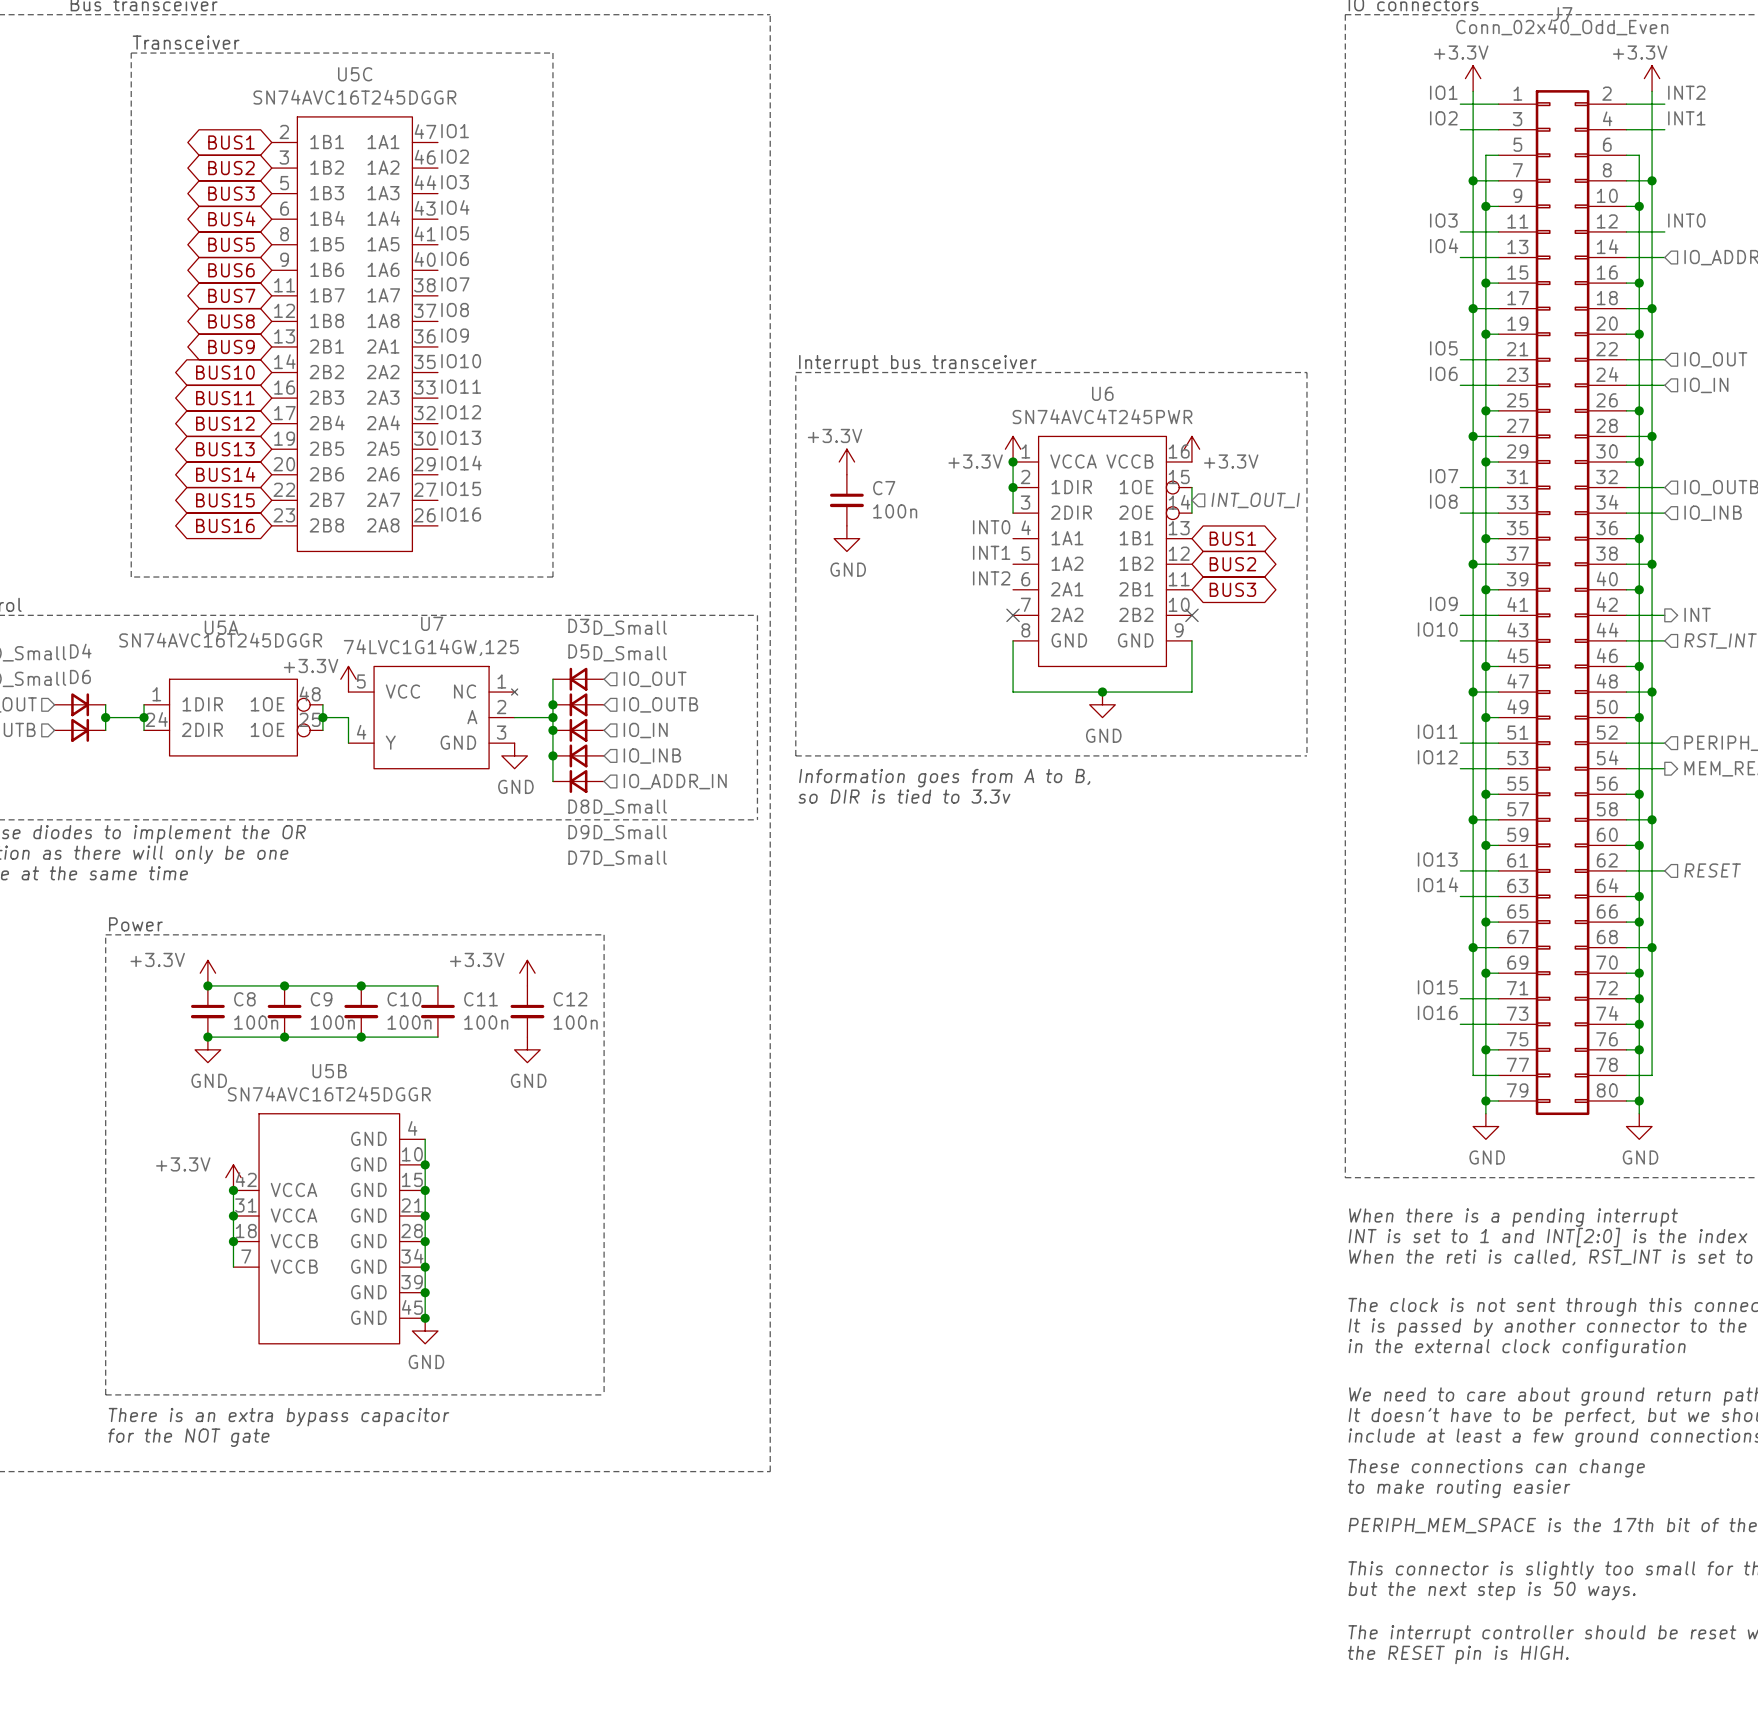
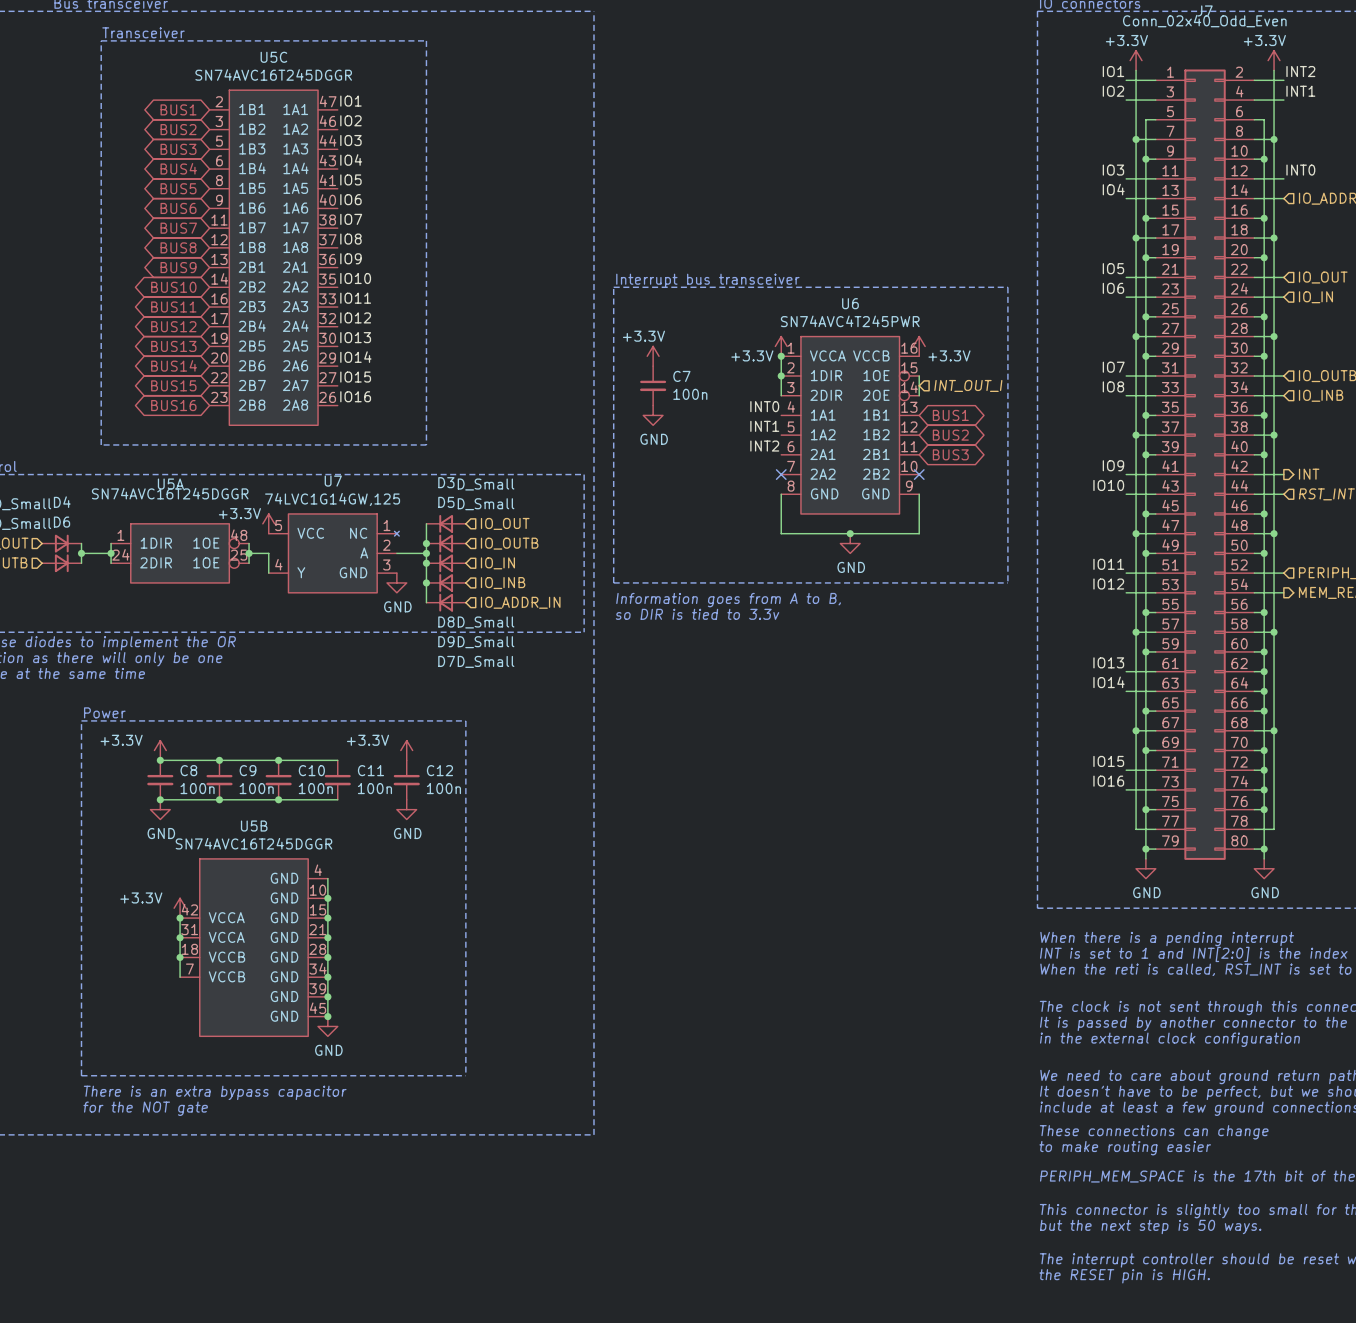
wire: (1639, 870) (1664, 870) -> none
junction: none -> (1264, 671)
hierarchical label: RESET (1712, 870) -> none

